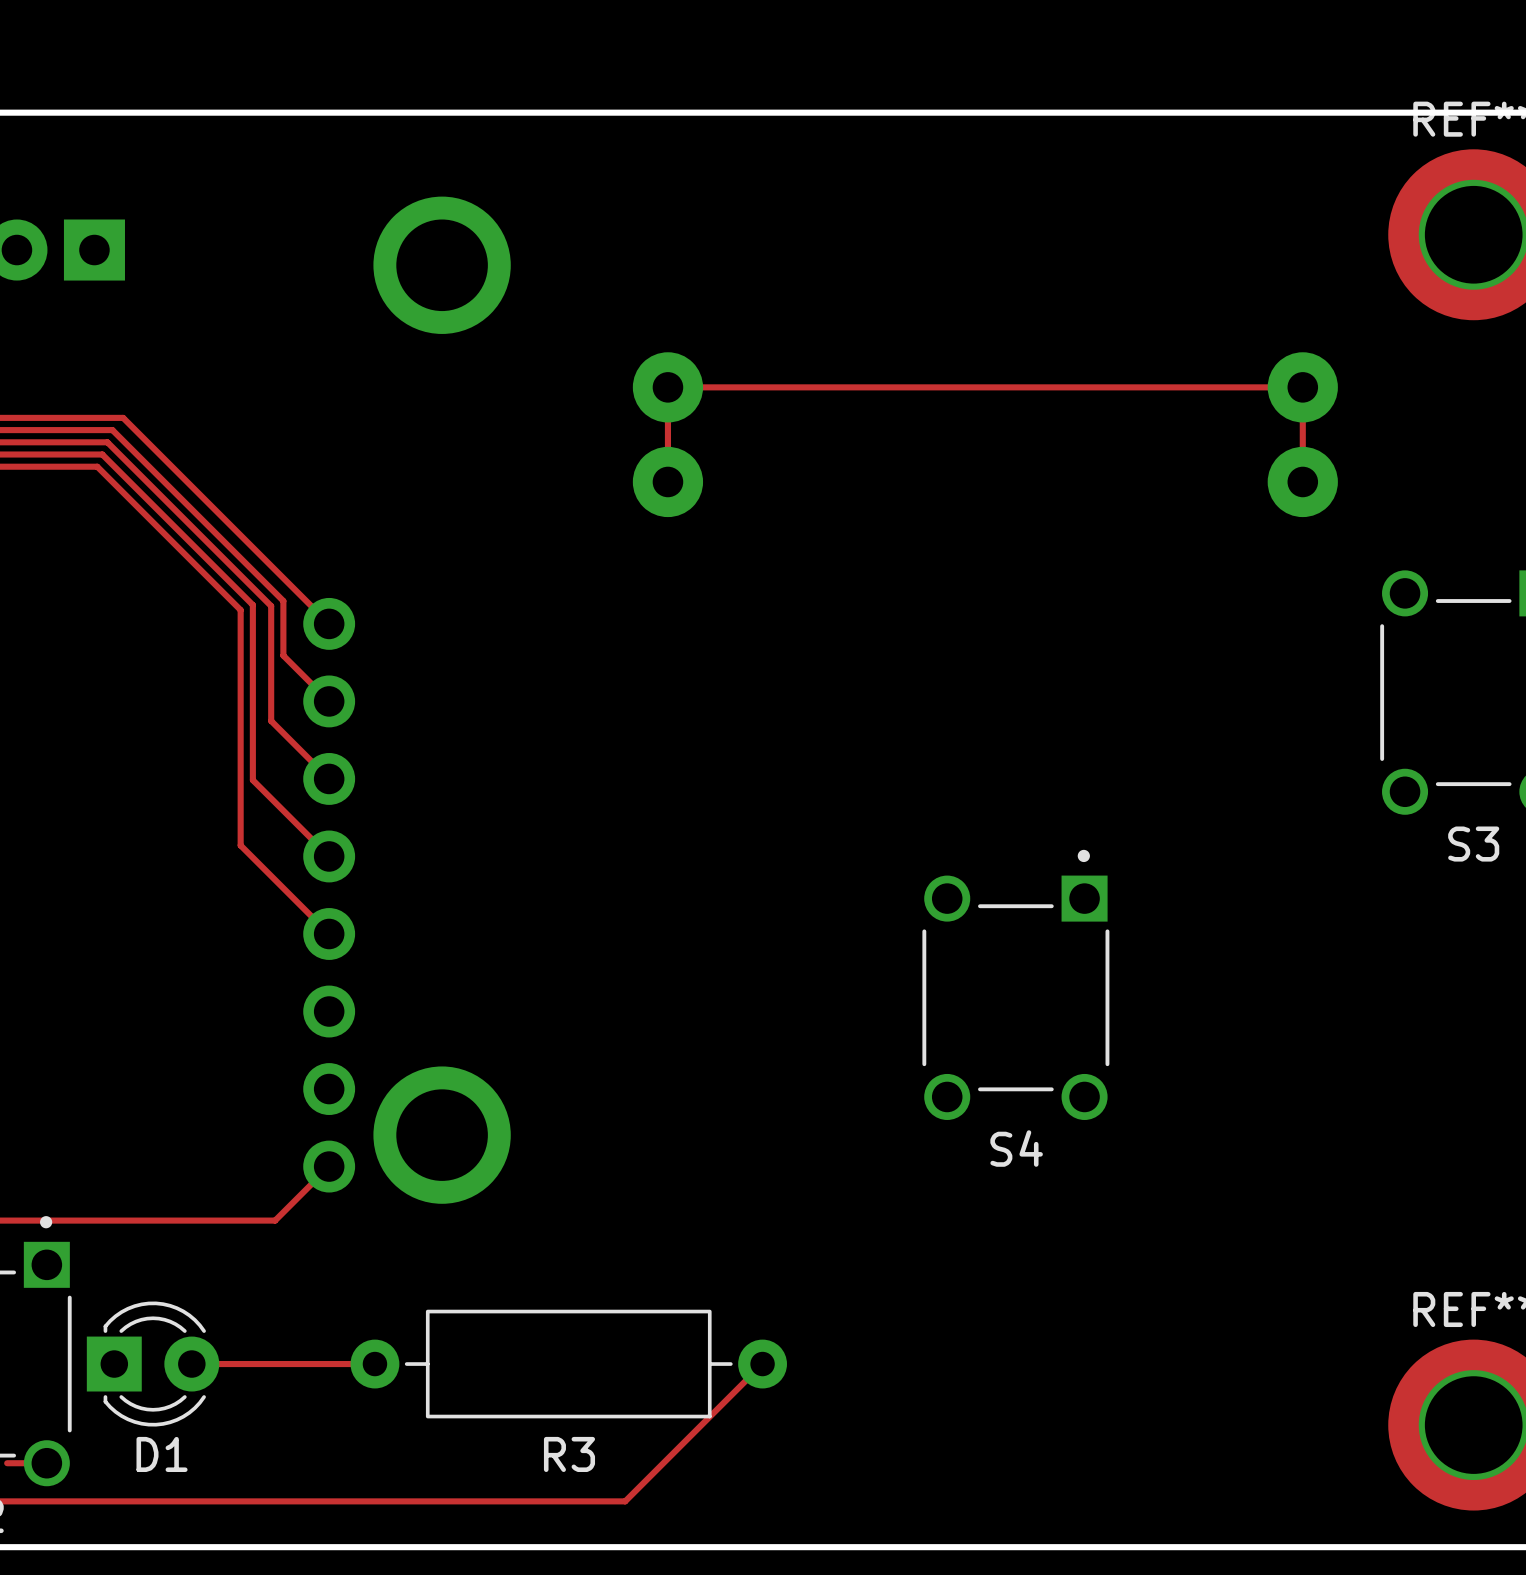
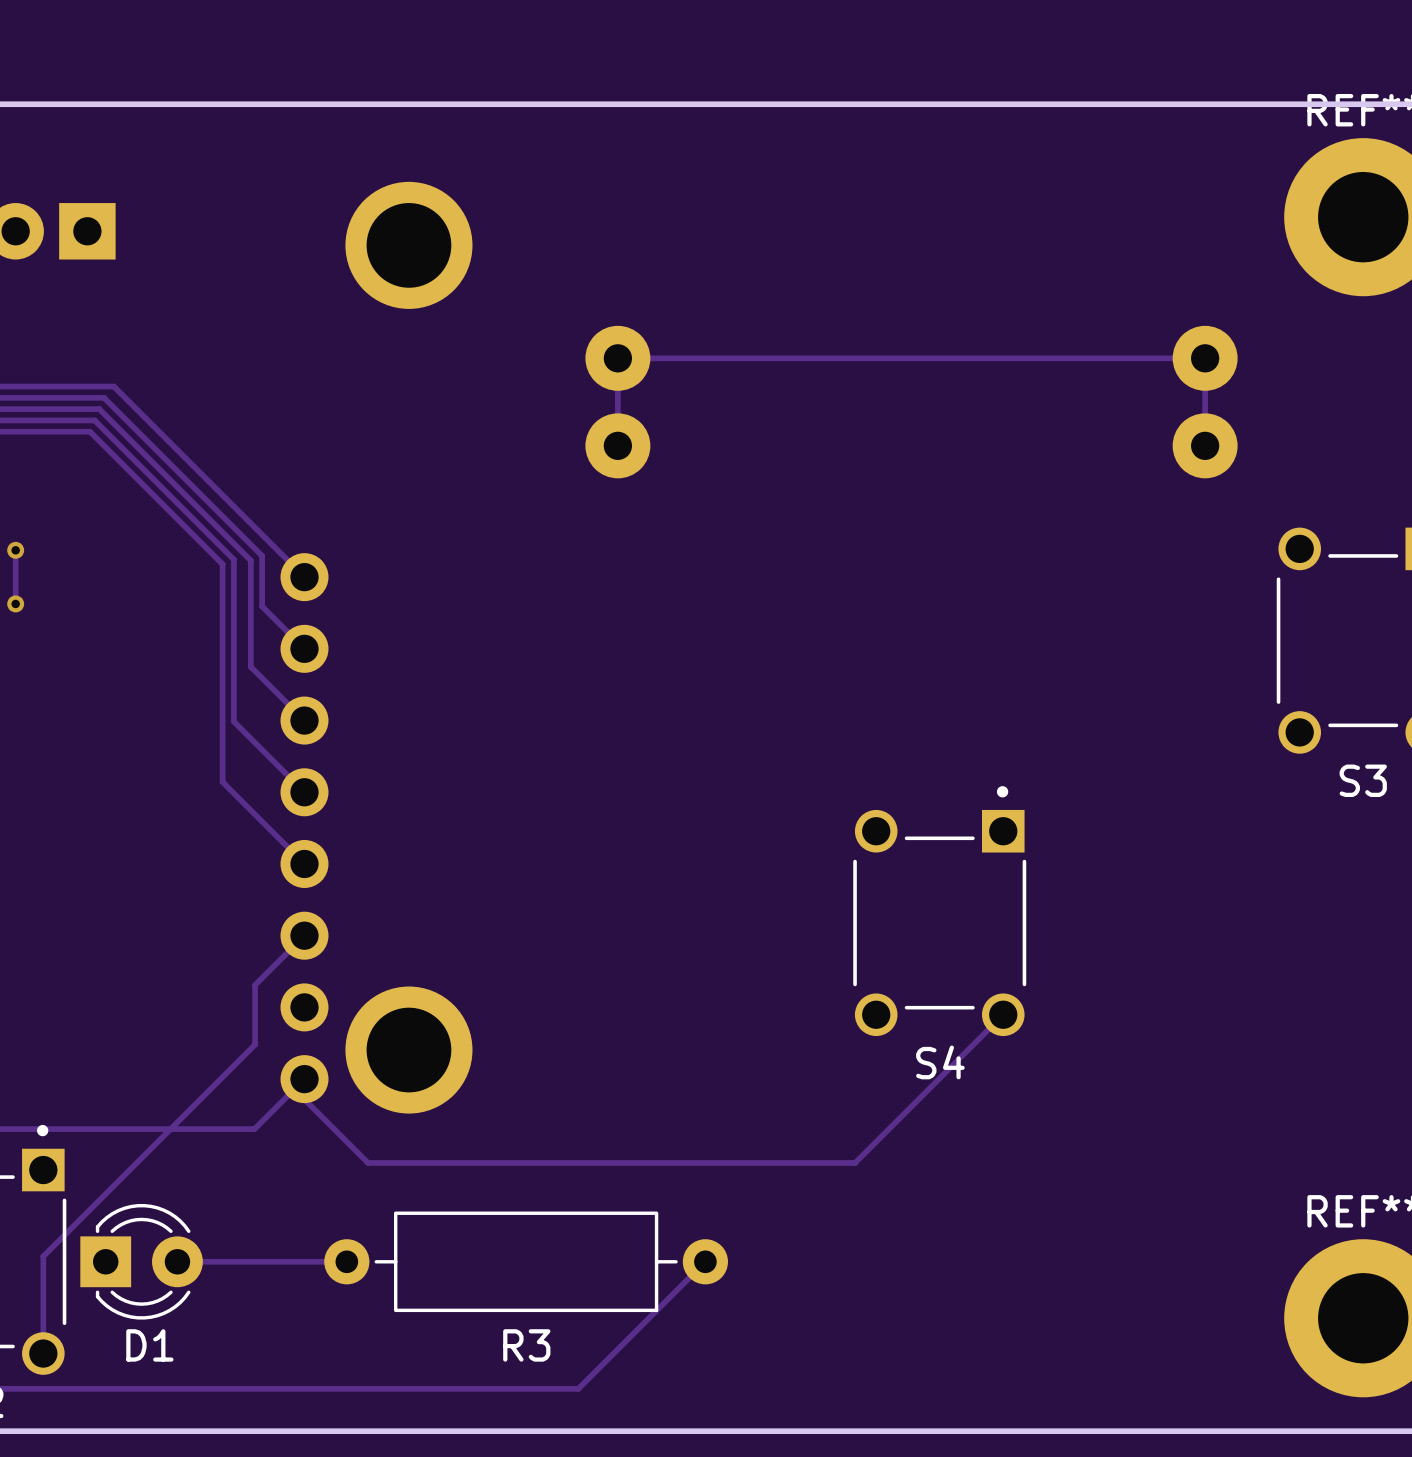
track: none -> (15, 550) (15, 603)
via: none -> (15, 550)
via: none -> (15, 603)
track: none -> (1003, 1014) (855, 1162) (368, 1162) (304, 1099)
track: (7, 1463) (46, 1463) -> (304, 935) (255, 985) (255, 1044) (43, 1256) (43, 1353)

